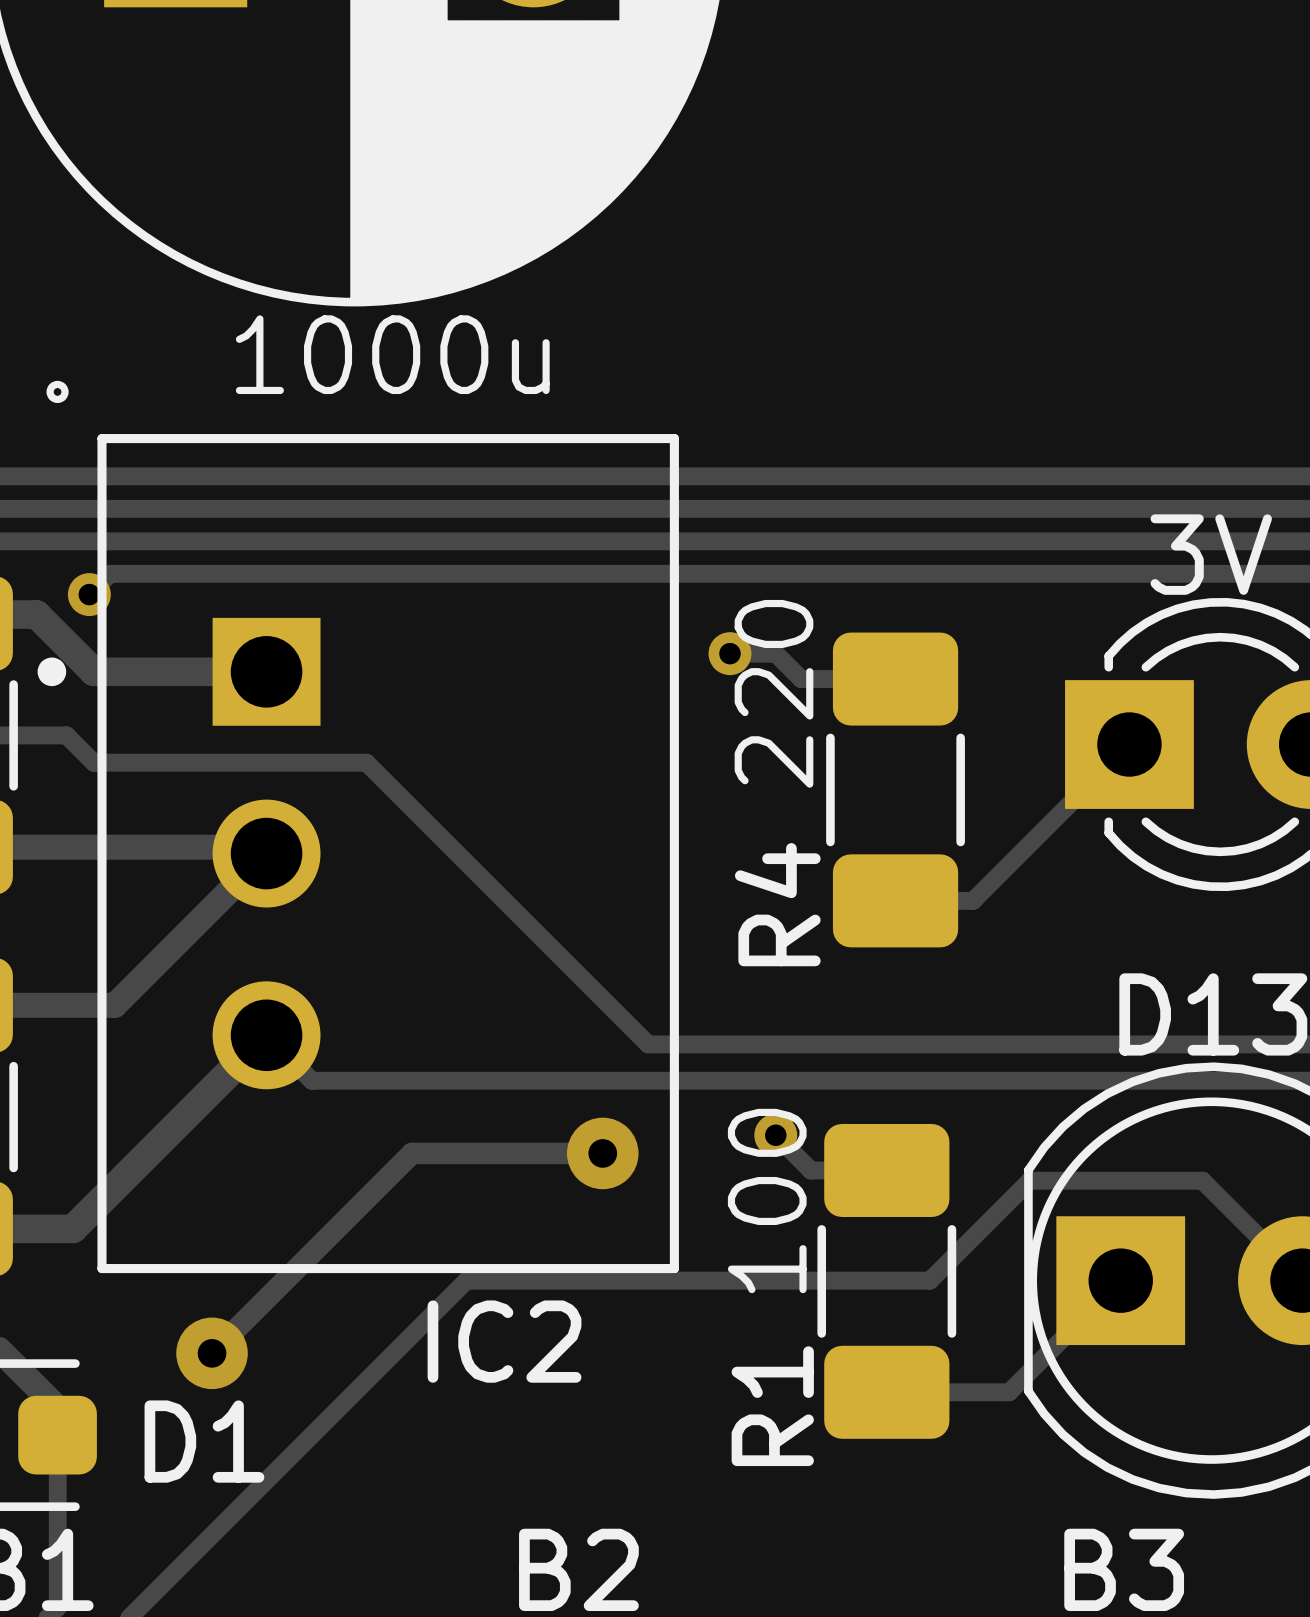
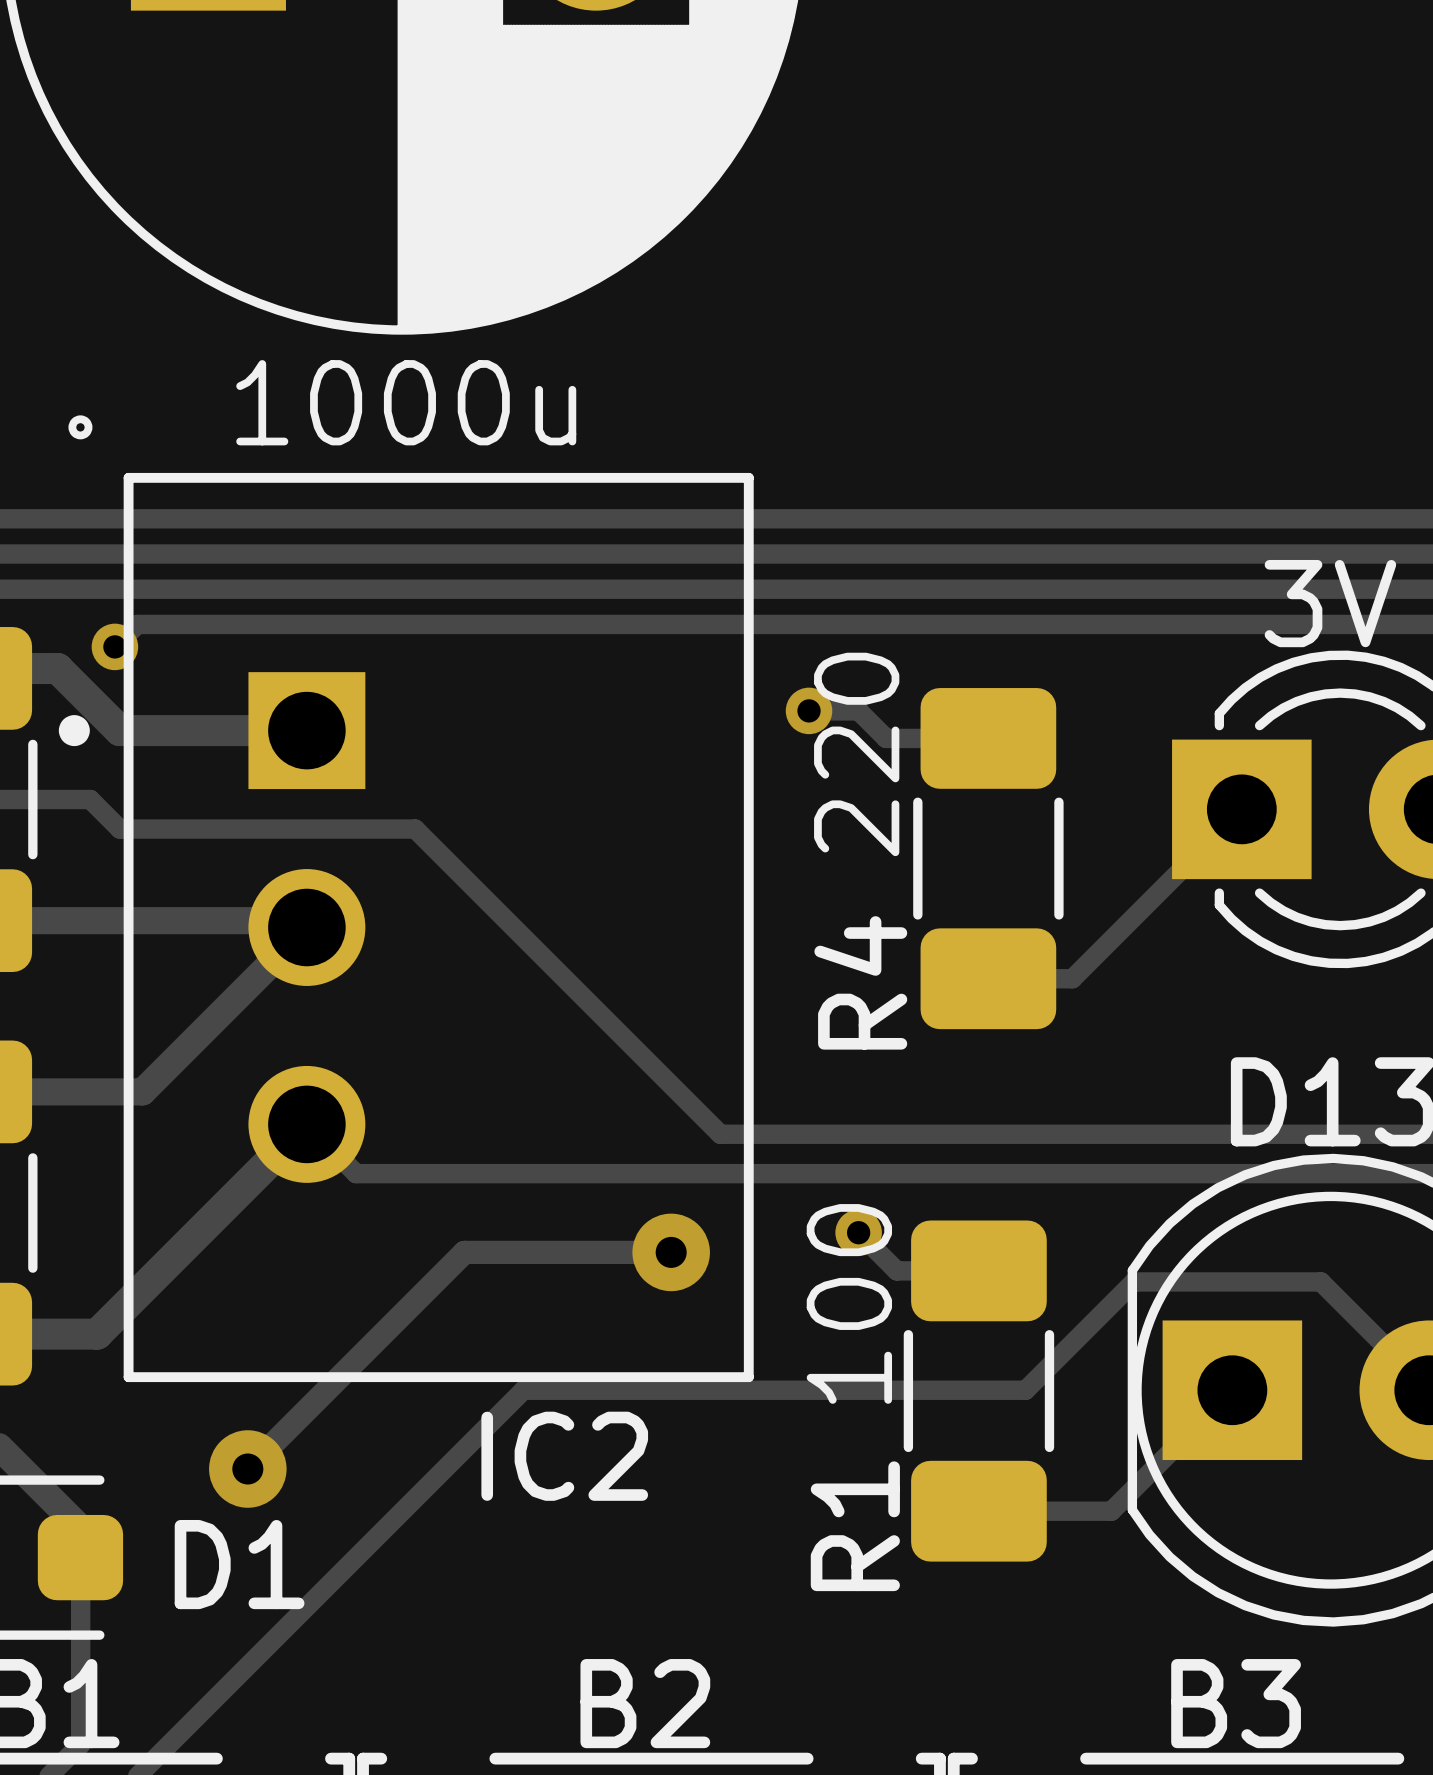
text position: 1000u (392, 354) -> 1000u (406, 402)

